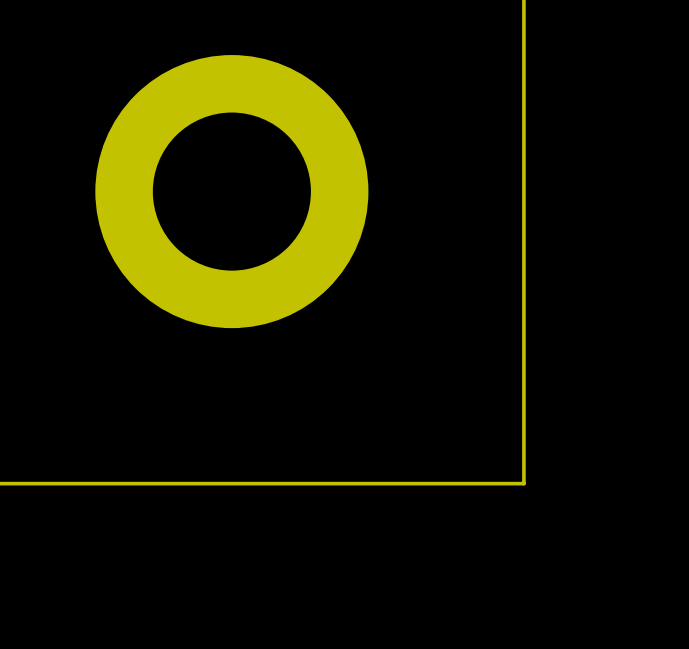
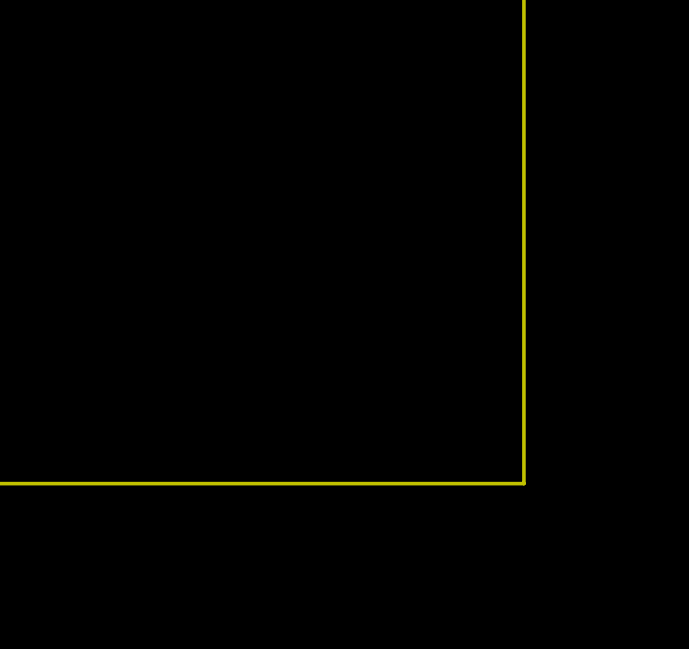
part: (231, 191) -> none

